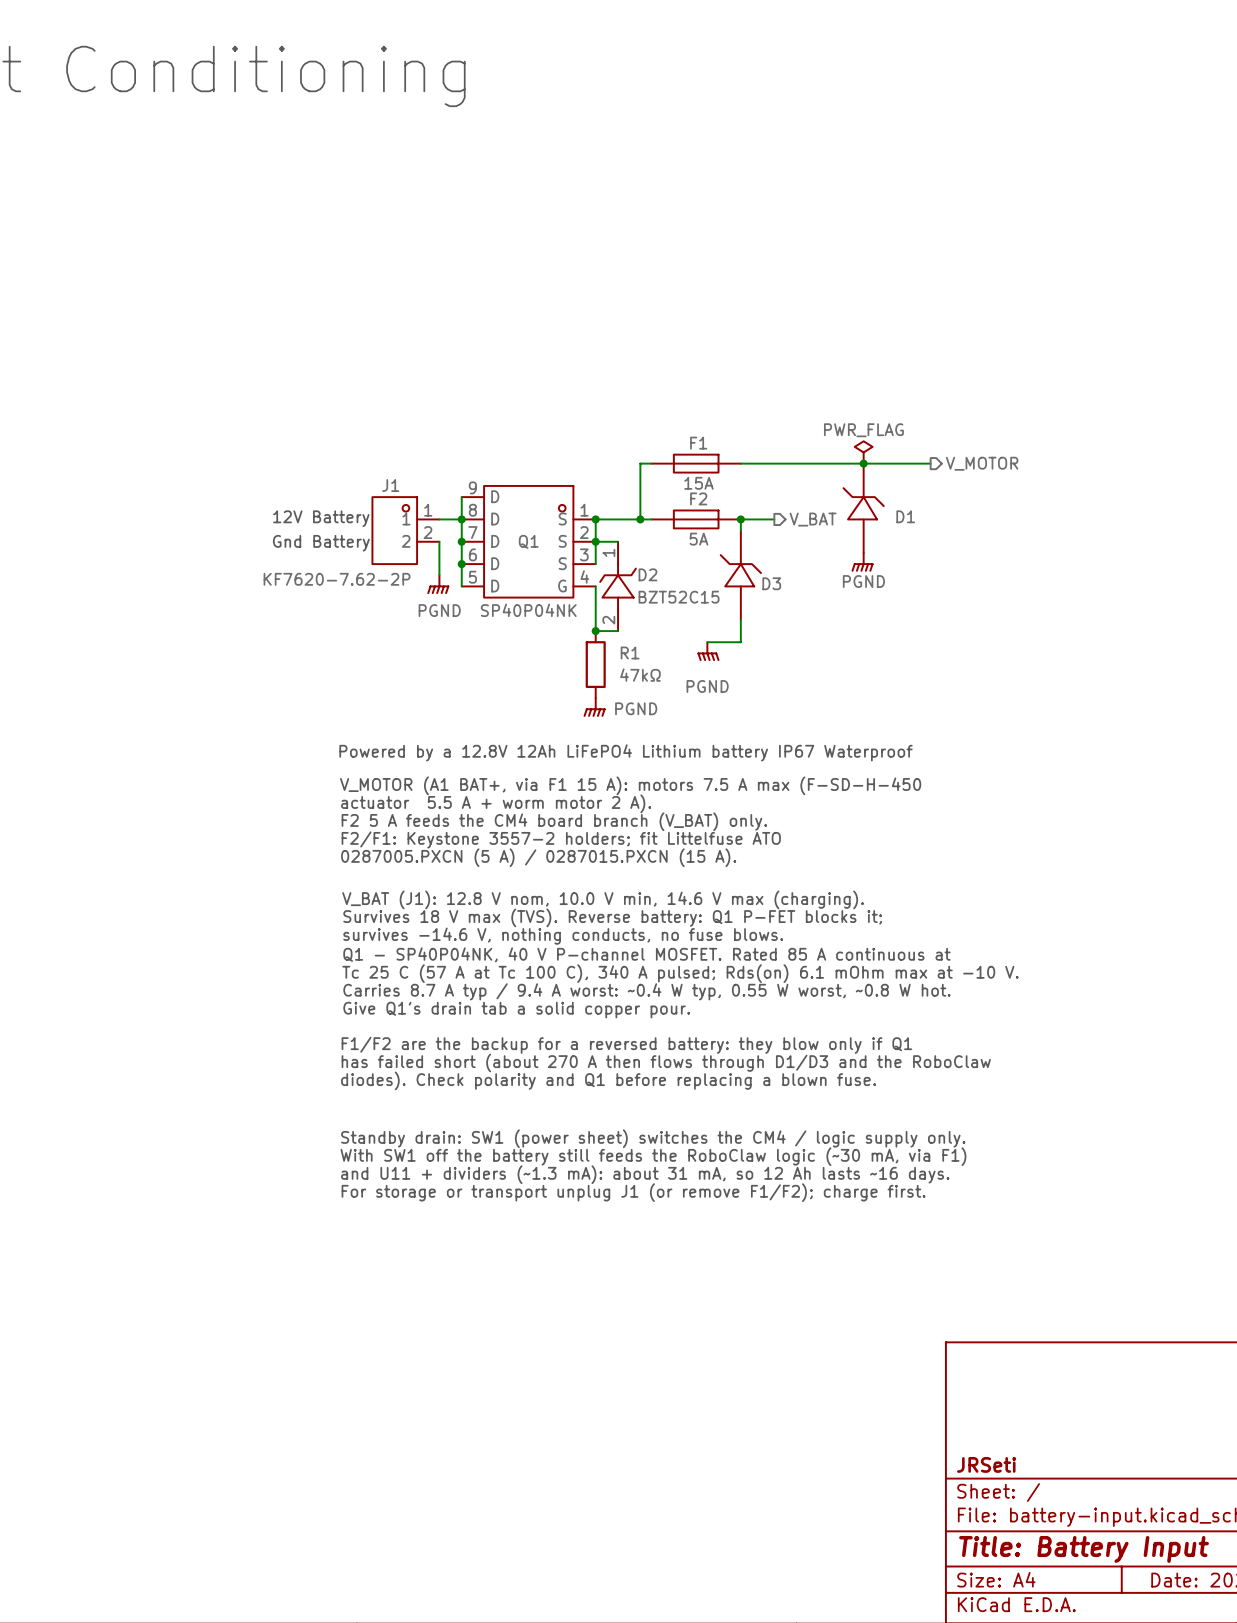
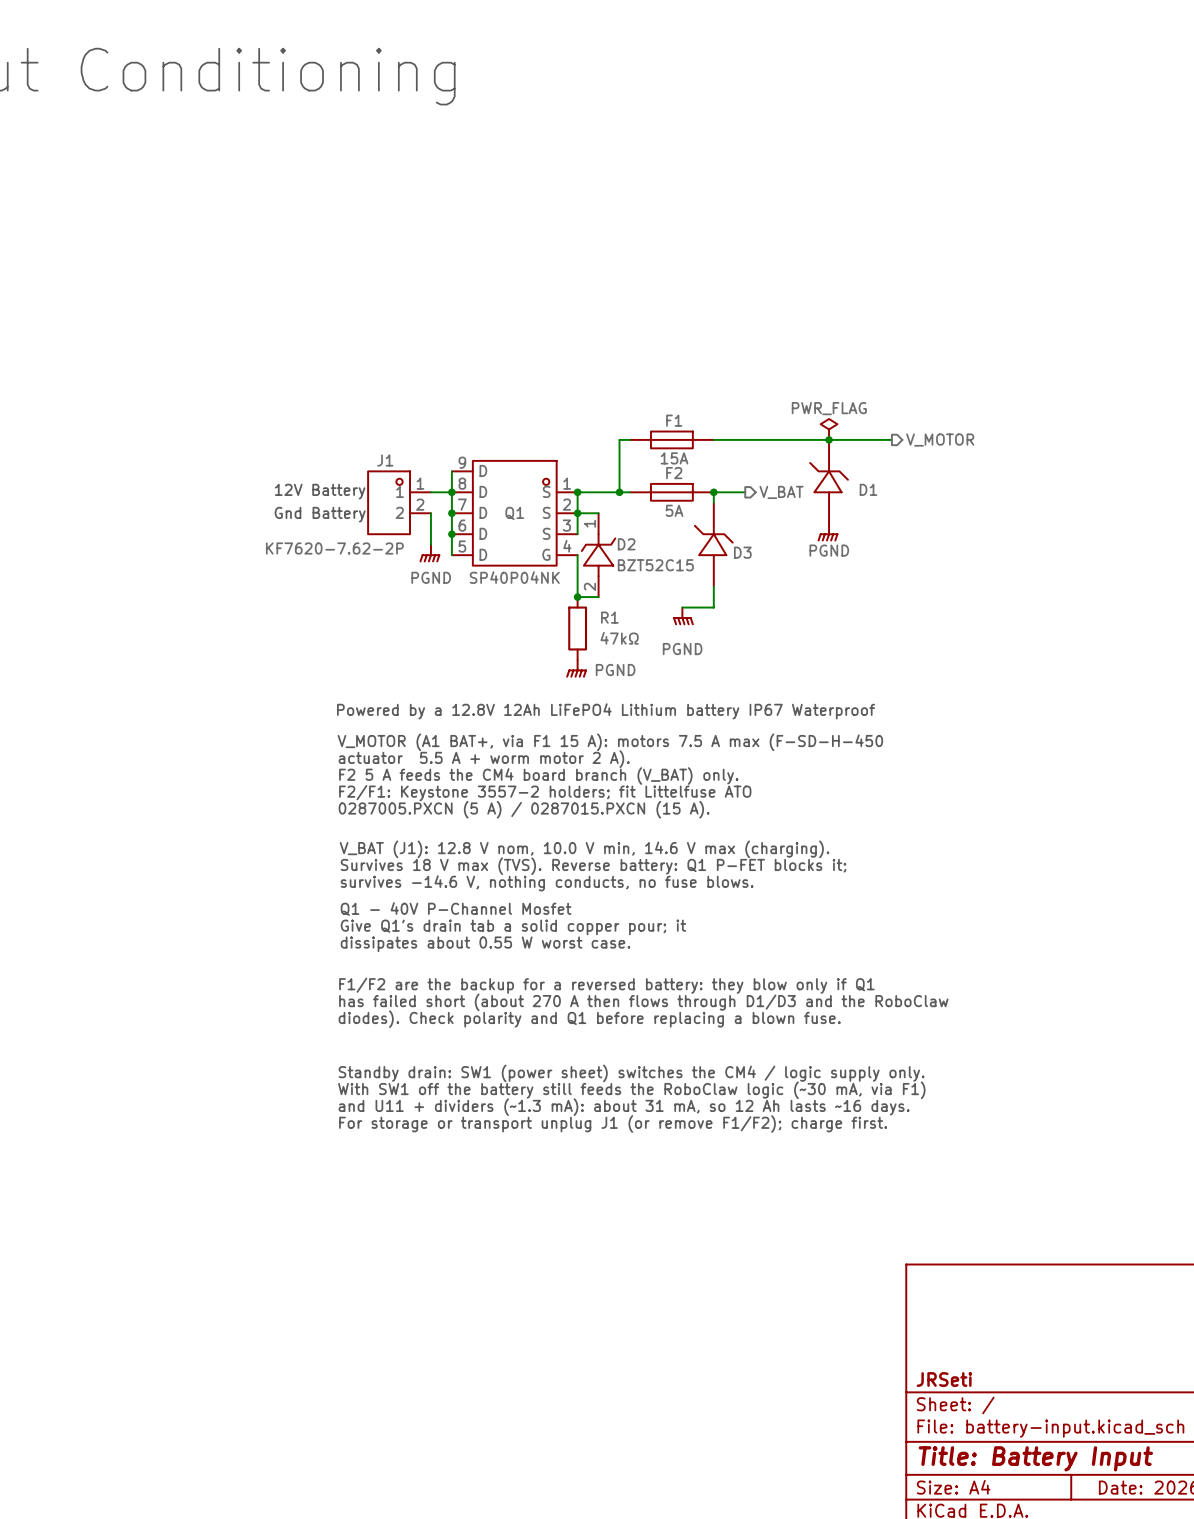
text: Q1 - SP40P04NK, 40 V P-channel MOSFET. Rated 85 A continuous at (646, 954) -> none
text: none -> Q1 - 40V P-Channel Mosfet (456, 909)
text: Tc 25 C (57 A at Tc 100 C), 340 A pulsed; Rds(on) 6.1 mOhm max at -10 V. (680, 973) -> none
text: none -> Give Q1's drain tab a solid copper pour; it (513, 927)
text: Carries 8.7 A typ / 9.4 A worst: ~0.4 W typ, 0.55 W worst, ~0.8 W hot. (646, 991) -> none
text: none -> dissipates about 0.55 W worst case. (485, 944)
text: Give Q1's drain tab a solid copper pour. (516, 1010) -> none

